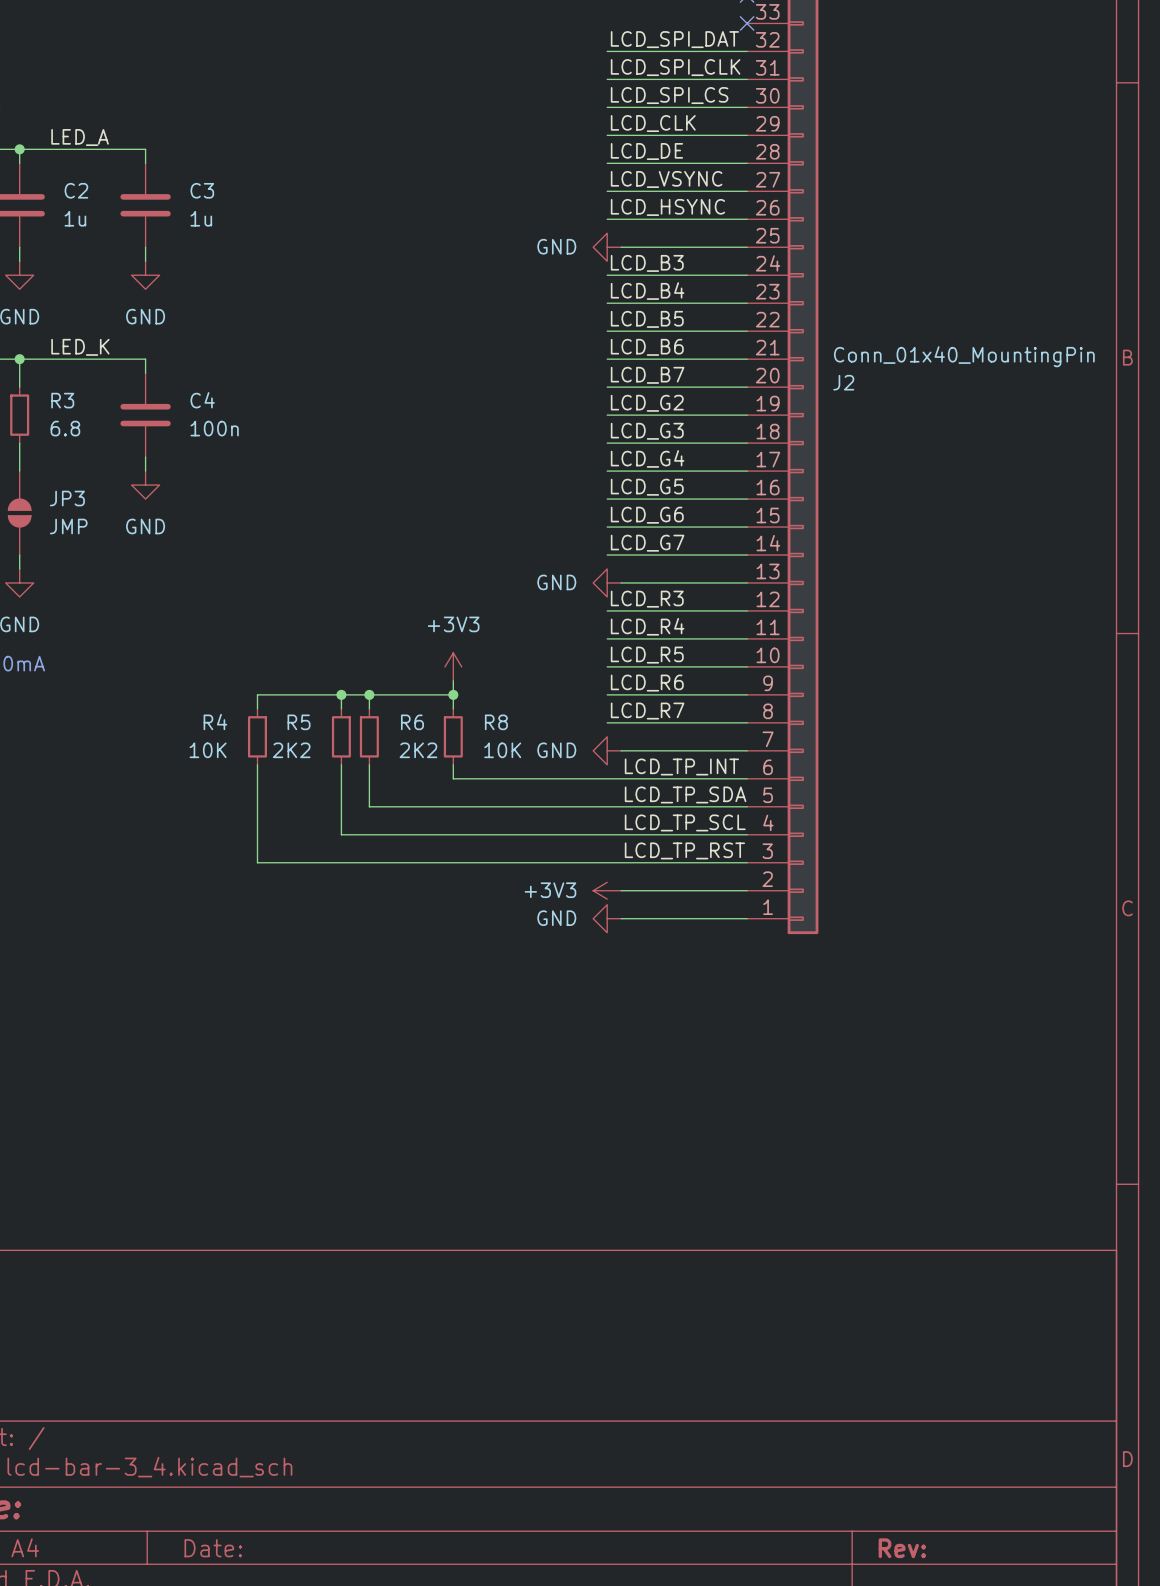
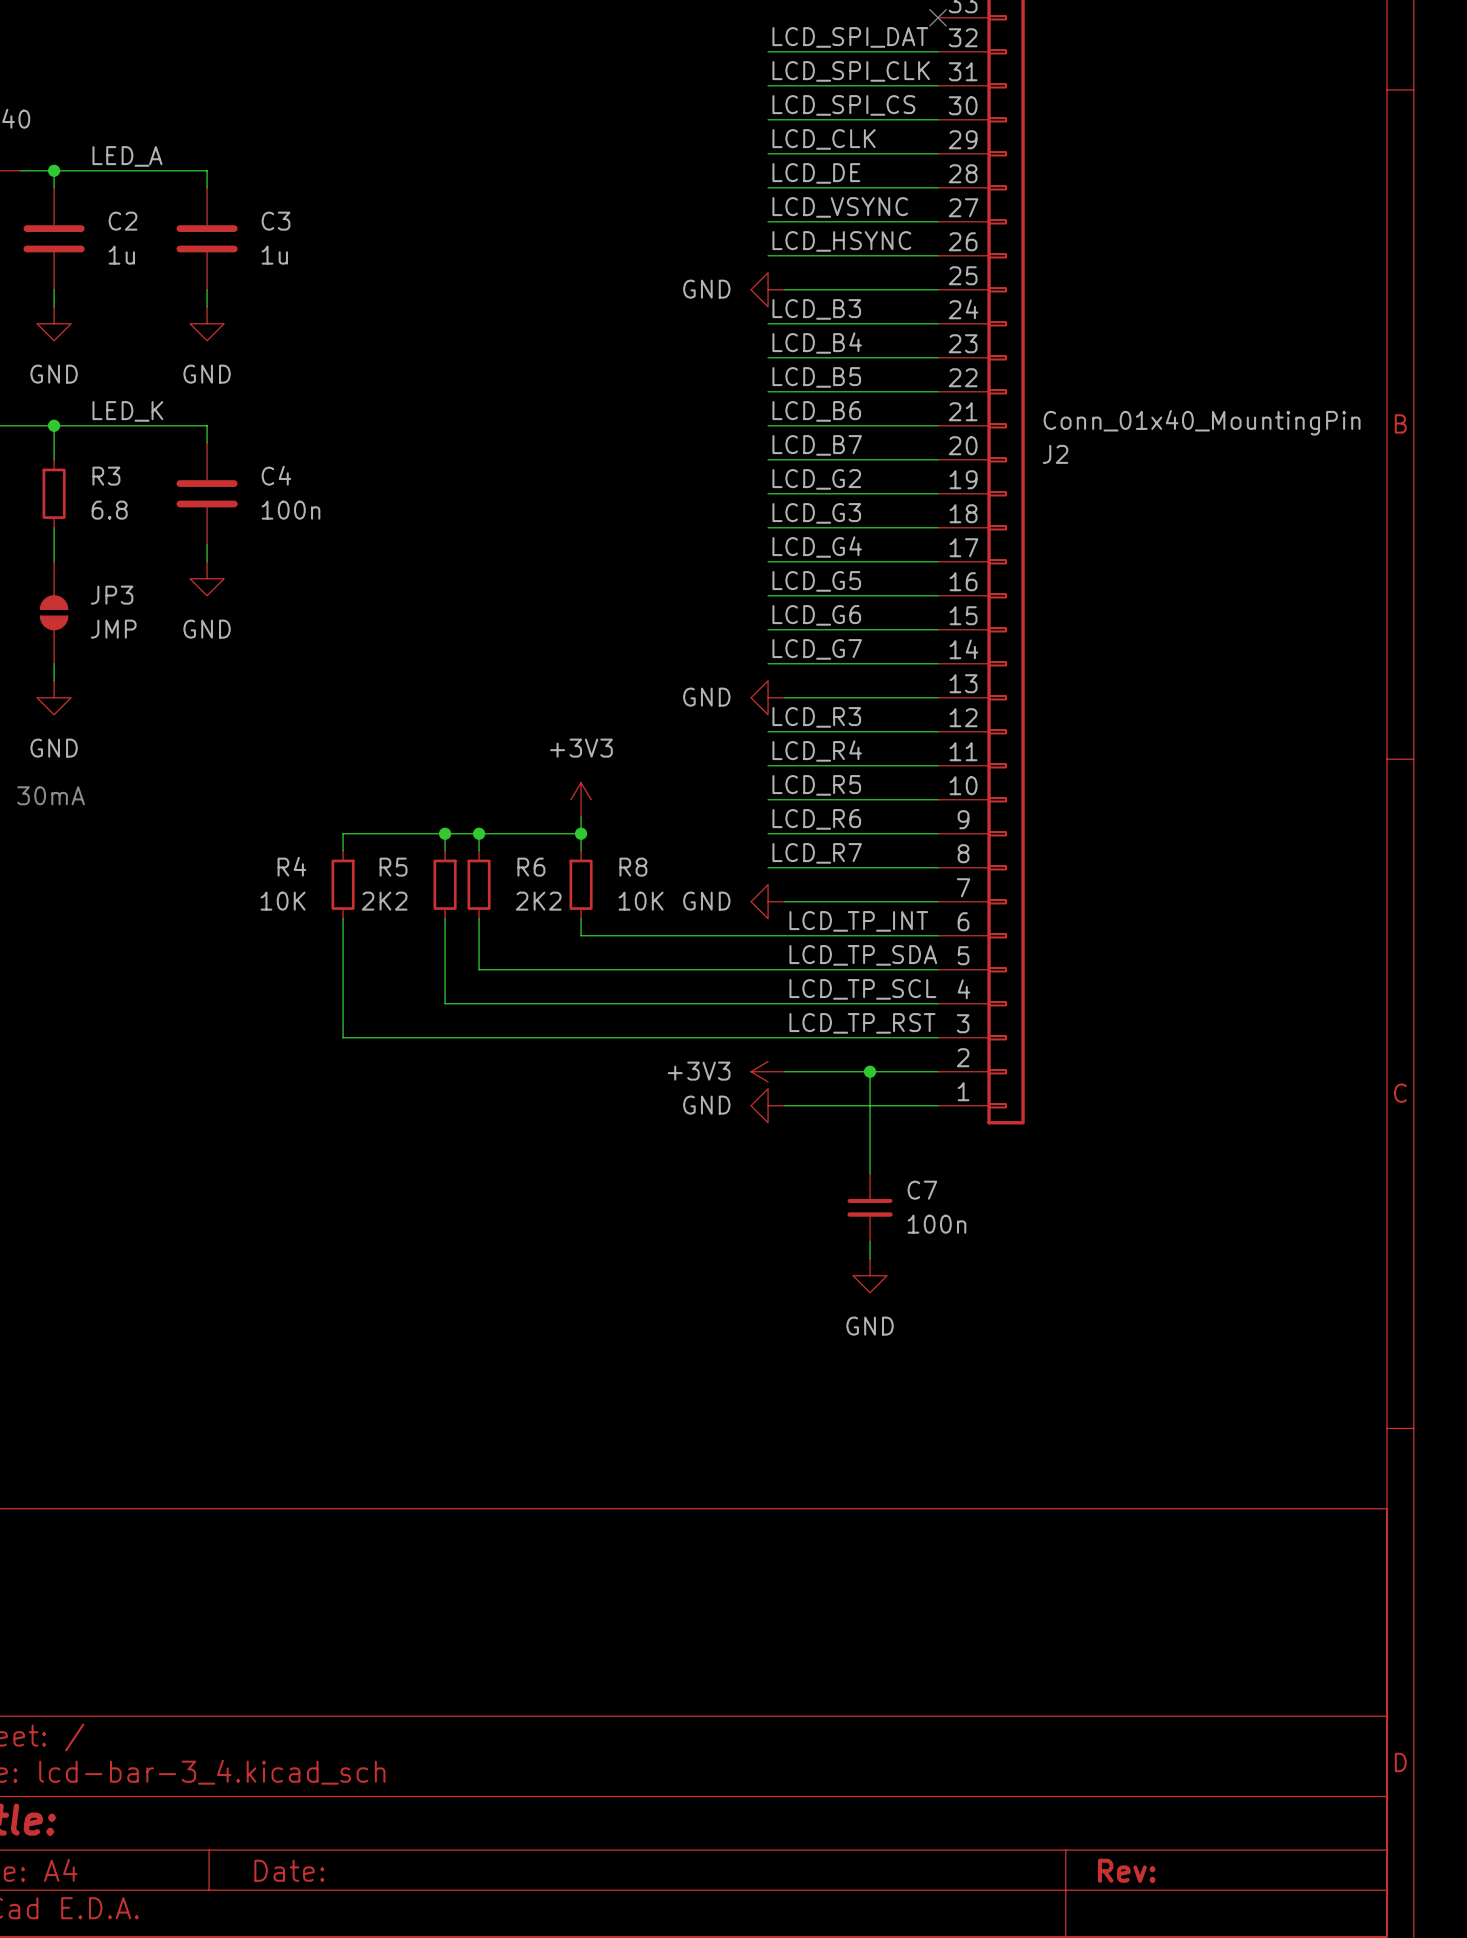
wire: none -> (870, 1071) (870, 1173)
junction: none -> (870, 1071)
C7: none -> 100n (870, 1207)
wire: none -> (870, 1241) (870, 1258)
power symbol: none -> GND (870, 1275)

